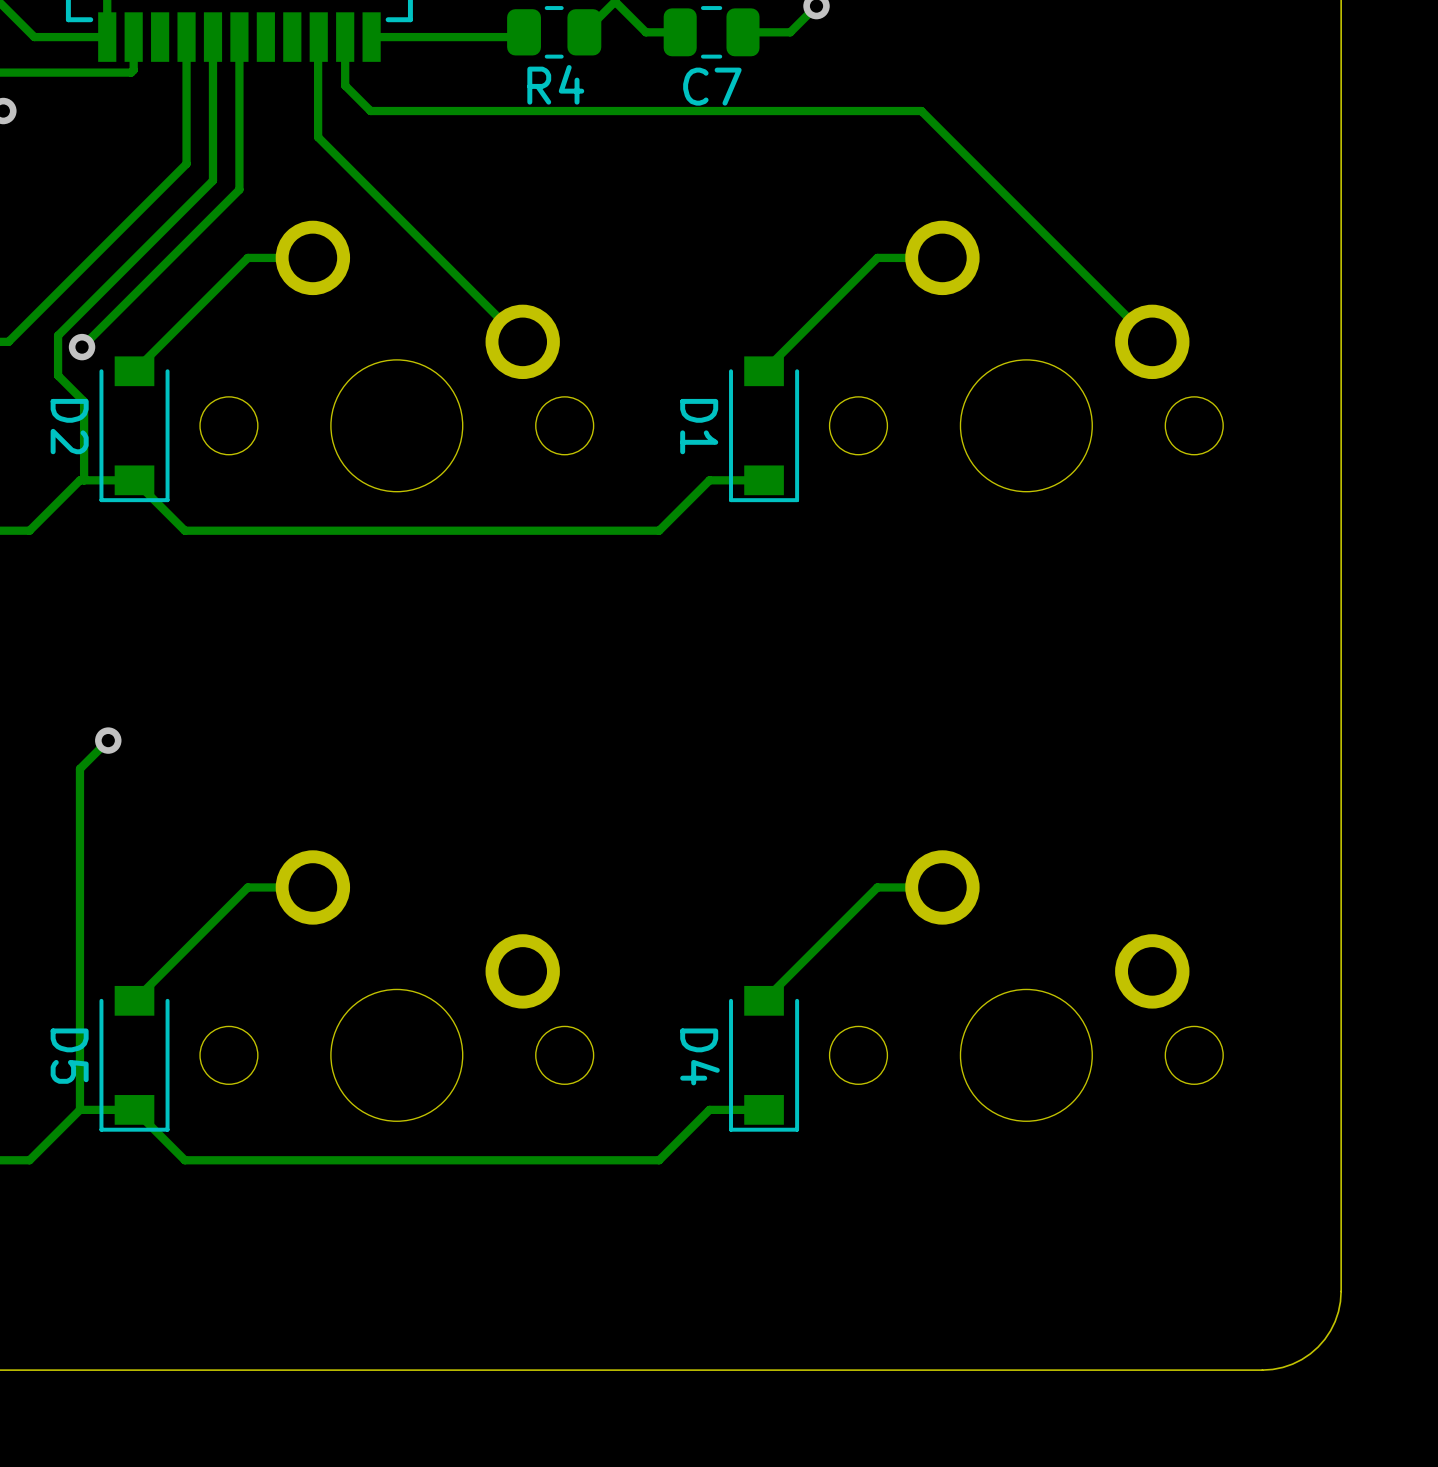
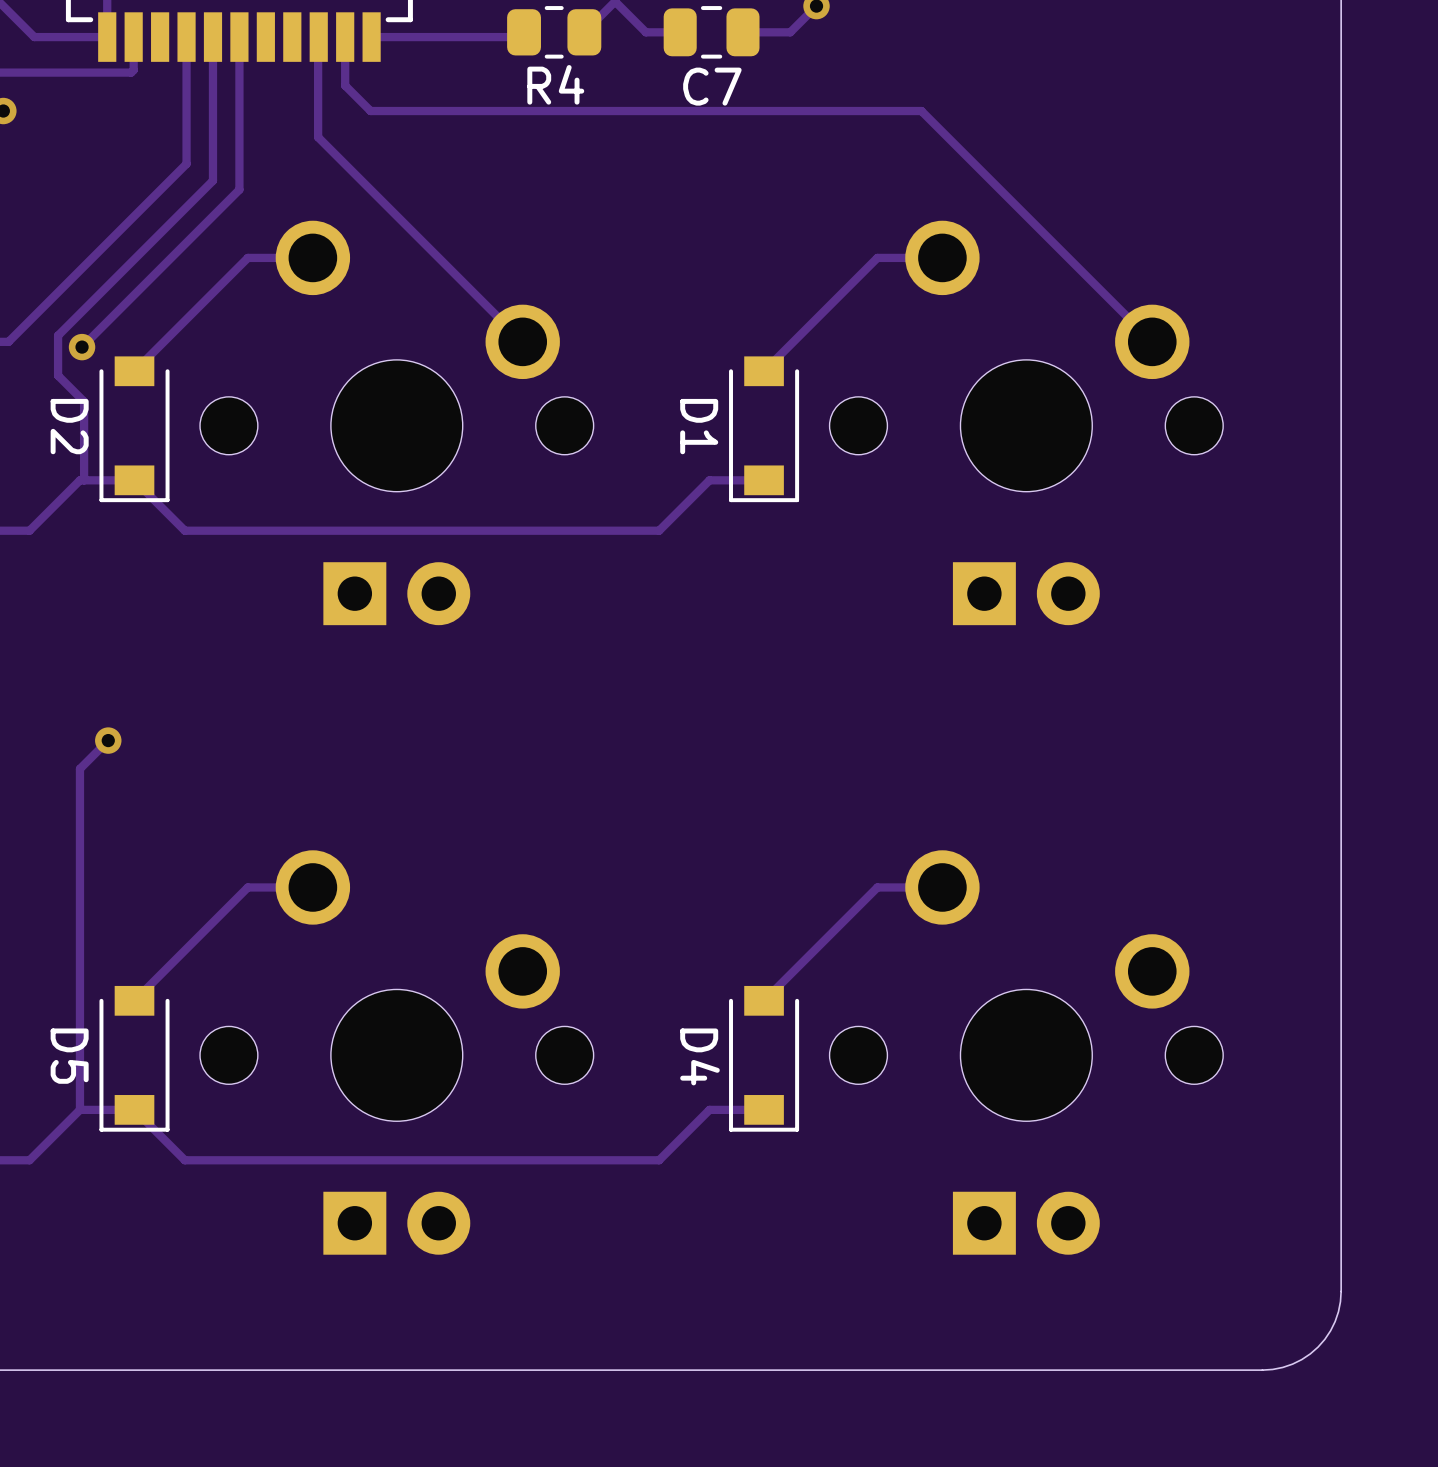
part: none -> (396, 422)
part: none -> (1026, 422)
part: none -> (396, 1052)
part: none -> (1026, 1052)

